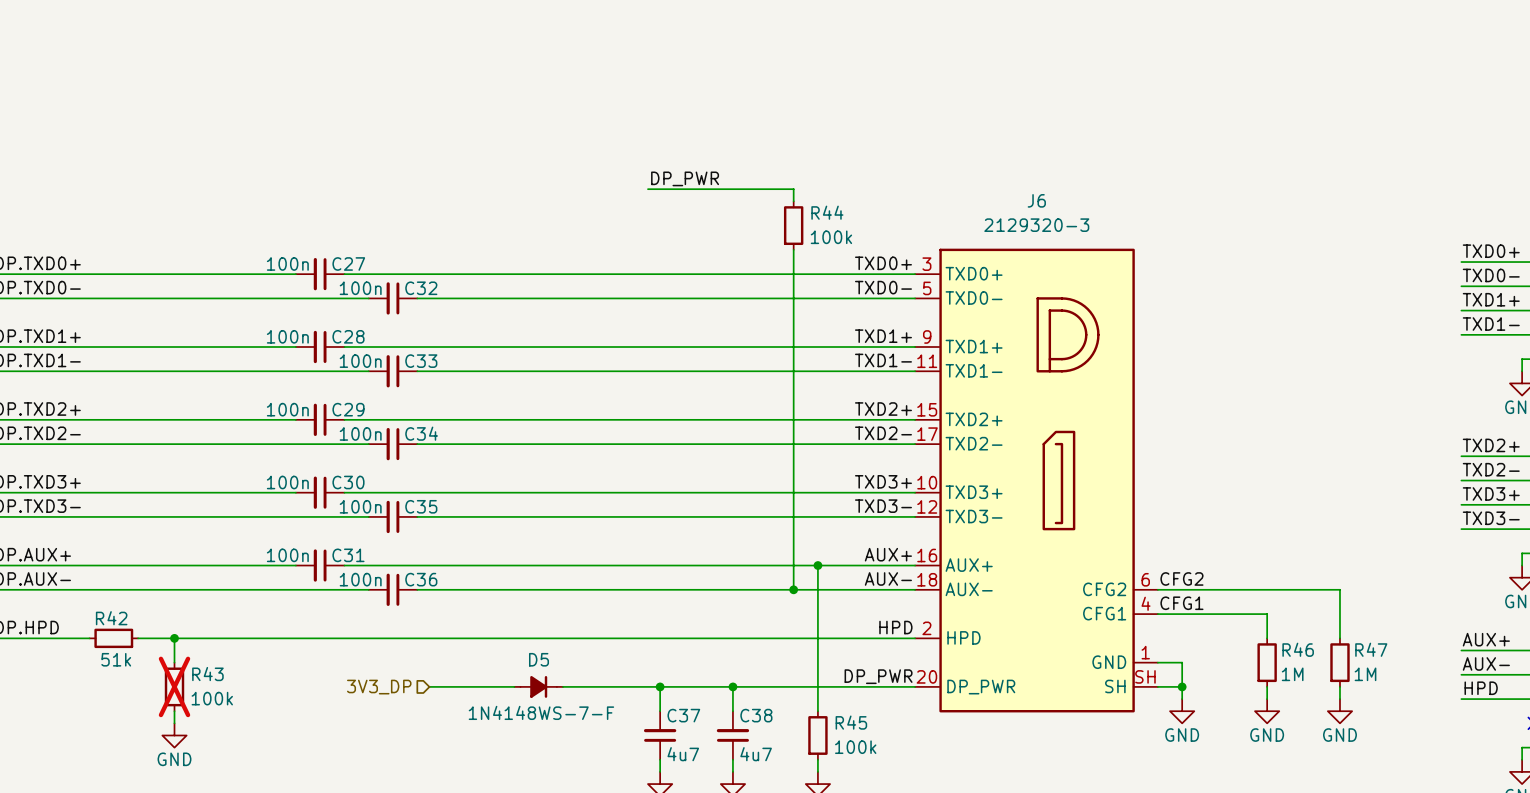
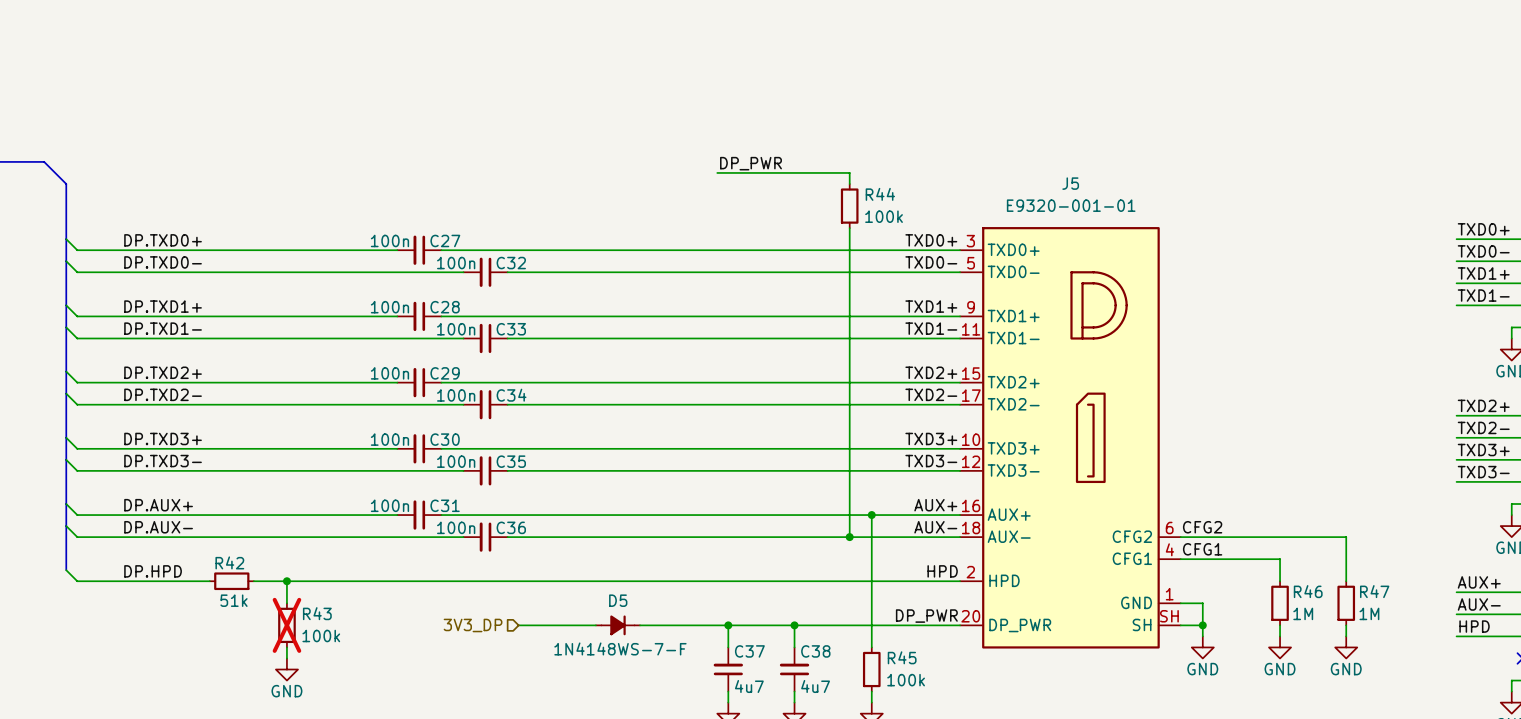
J6 name: J6 (1036, 200) -> J5 (1070, 183)
J6 text: 2129320-3 (1036, 225) -> E9320-001-01 (1071, 205)

